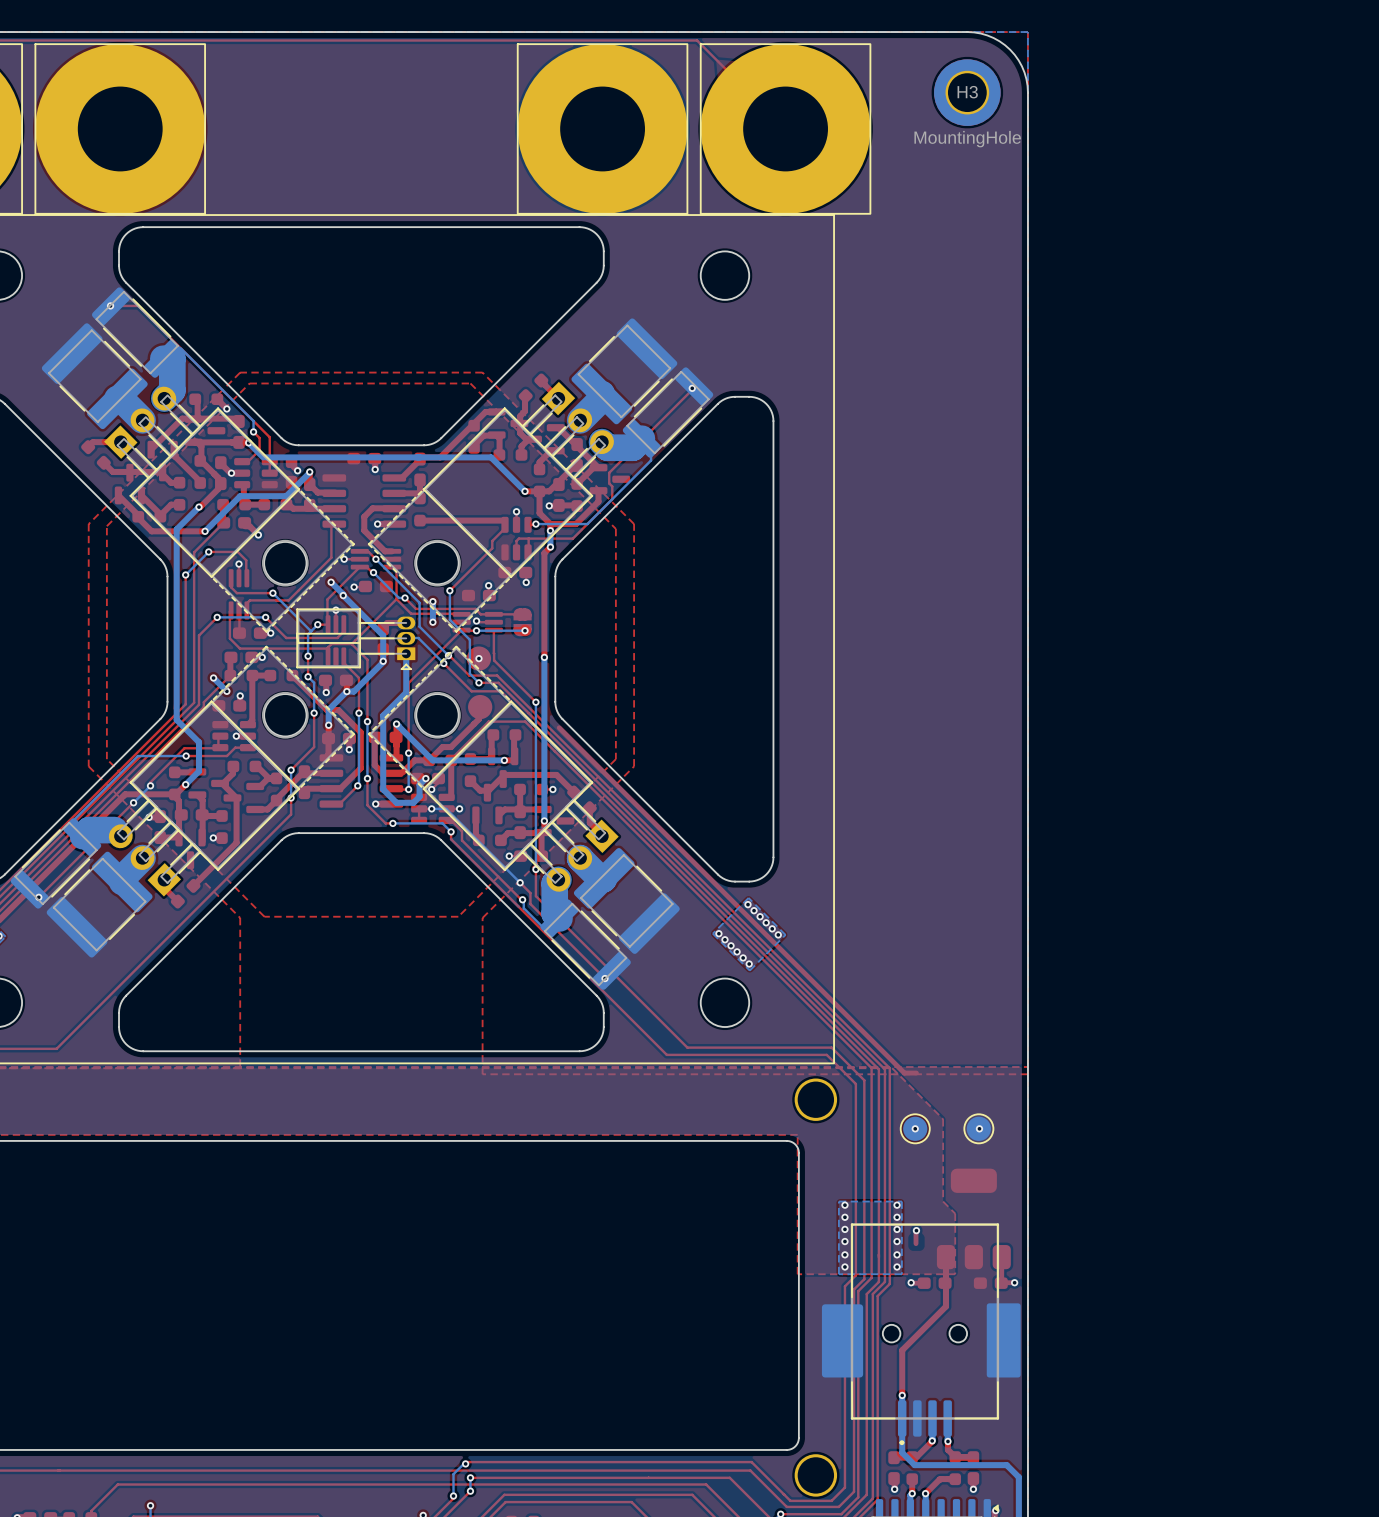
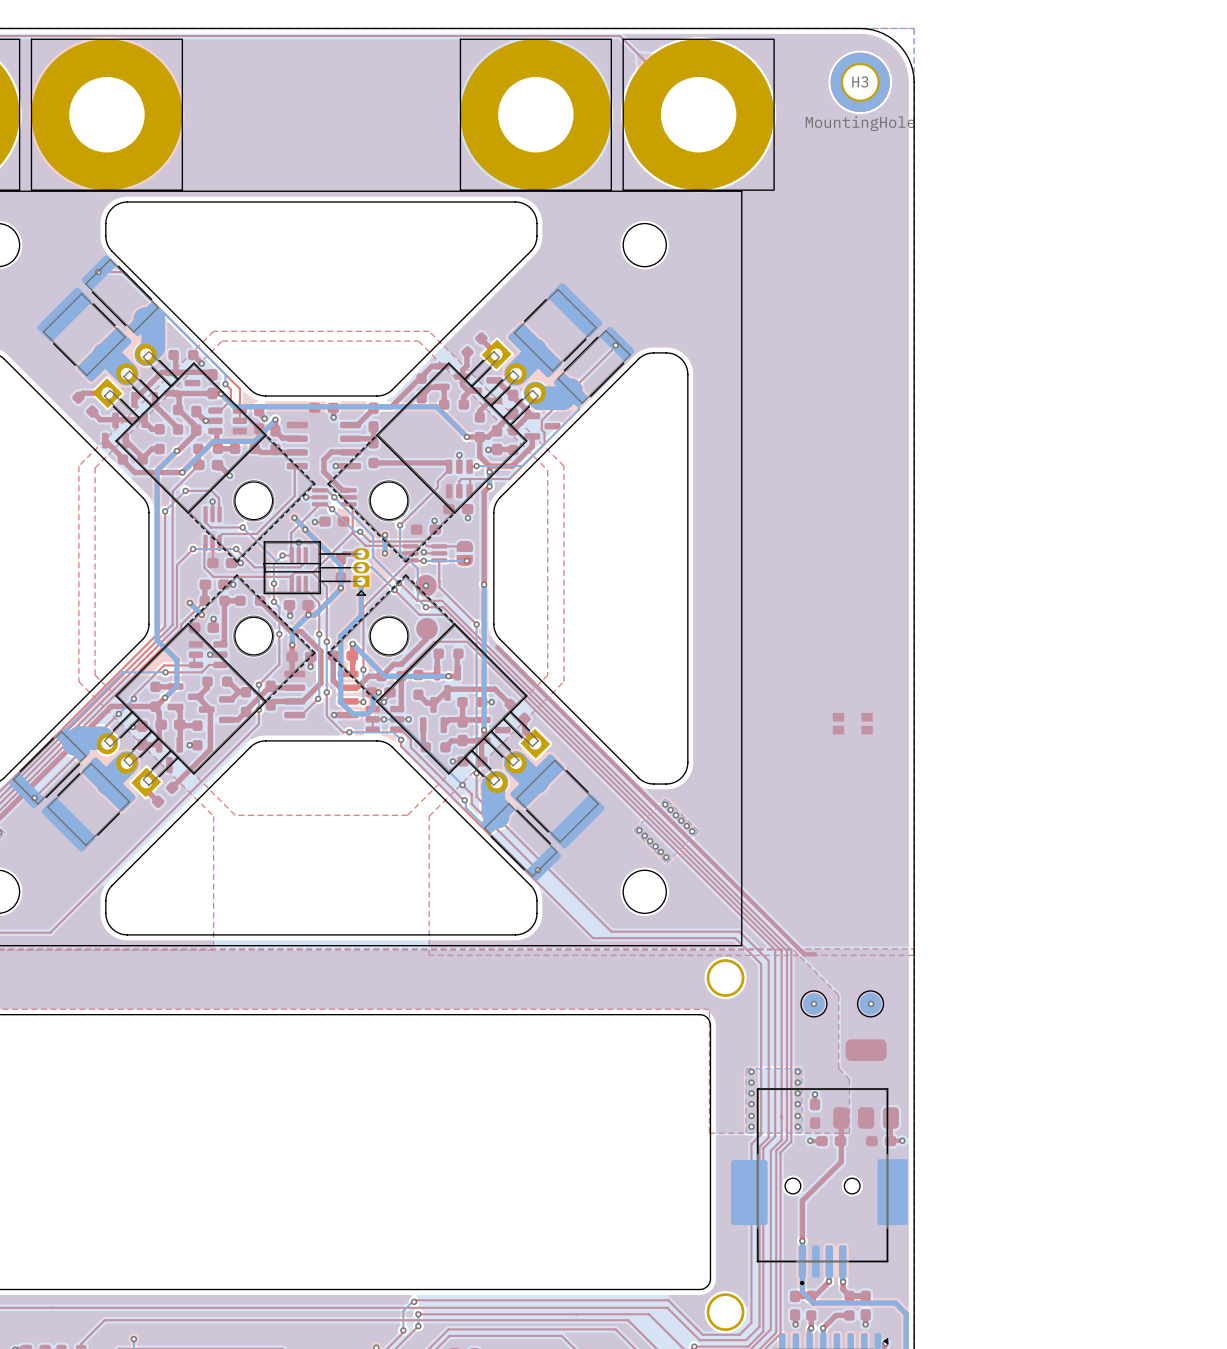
part: none -> (852, 723)
part: none -> (815, 1113)

